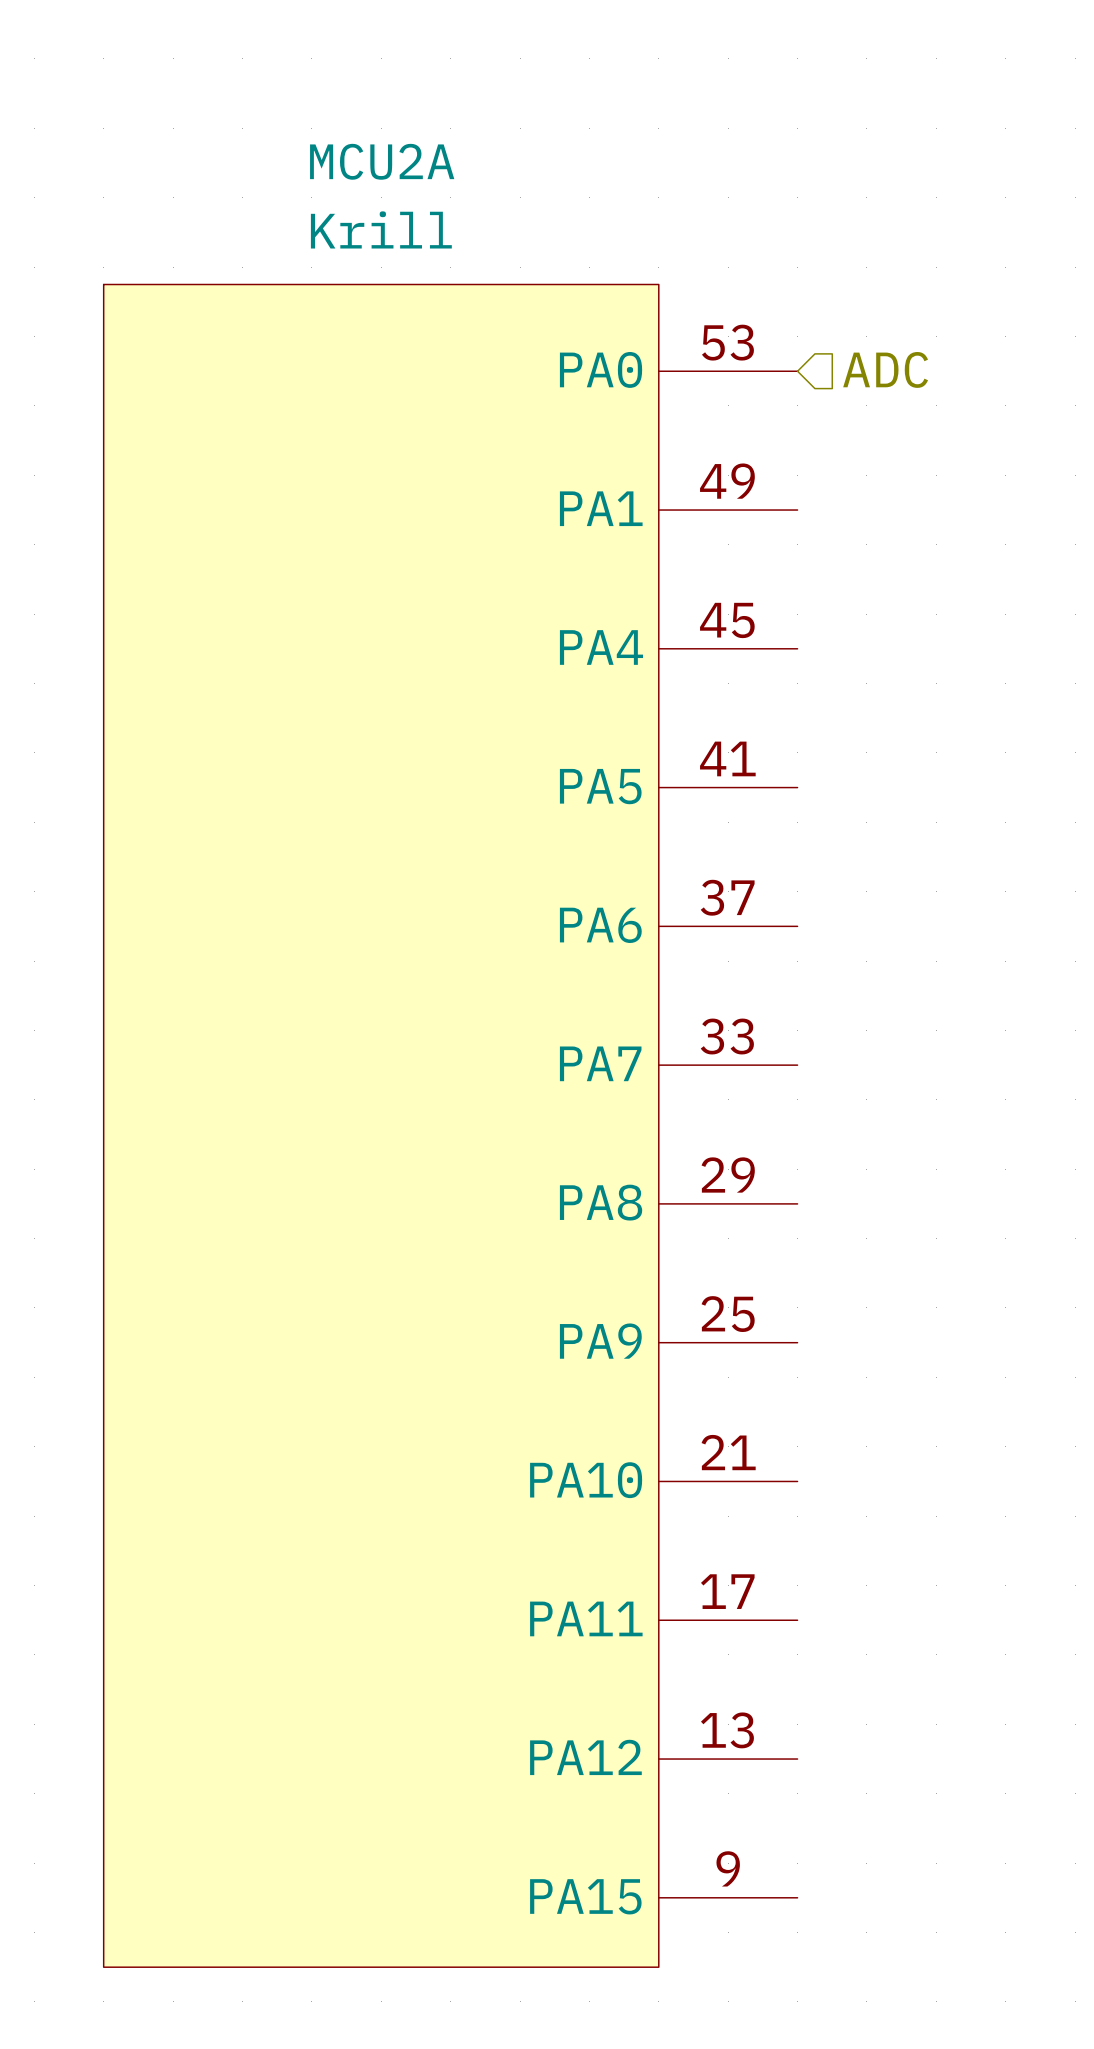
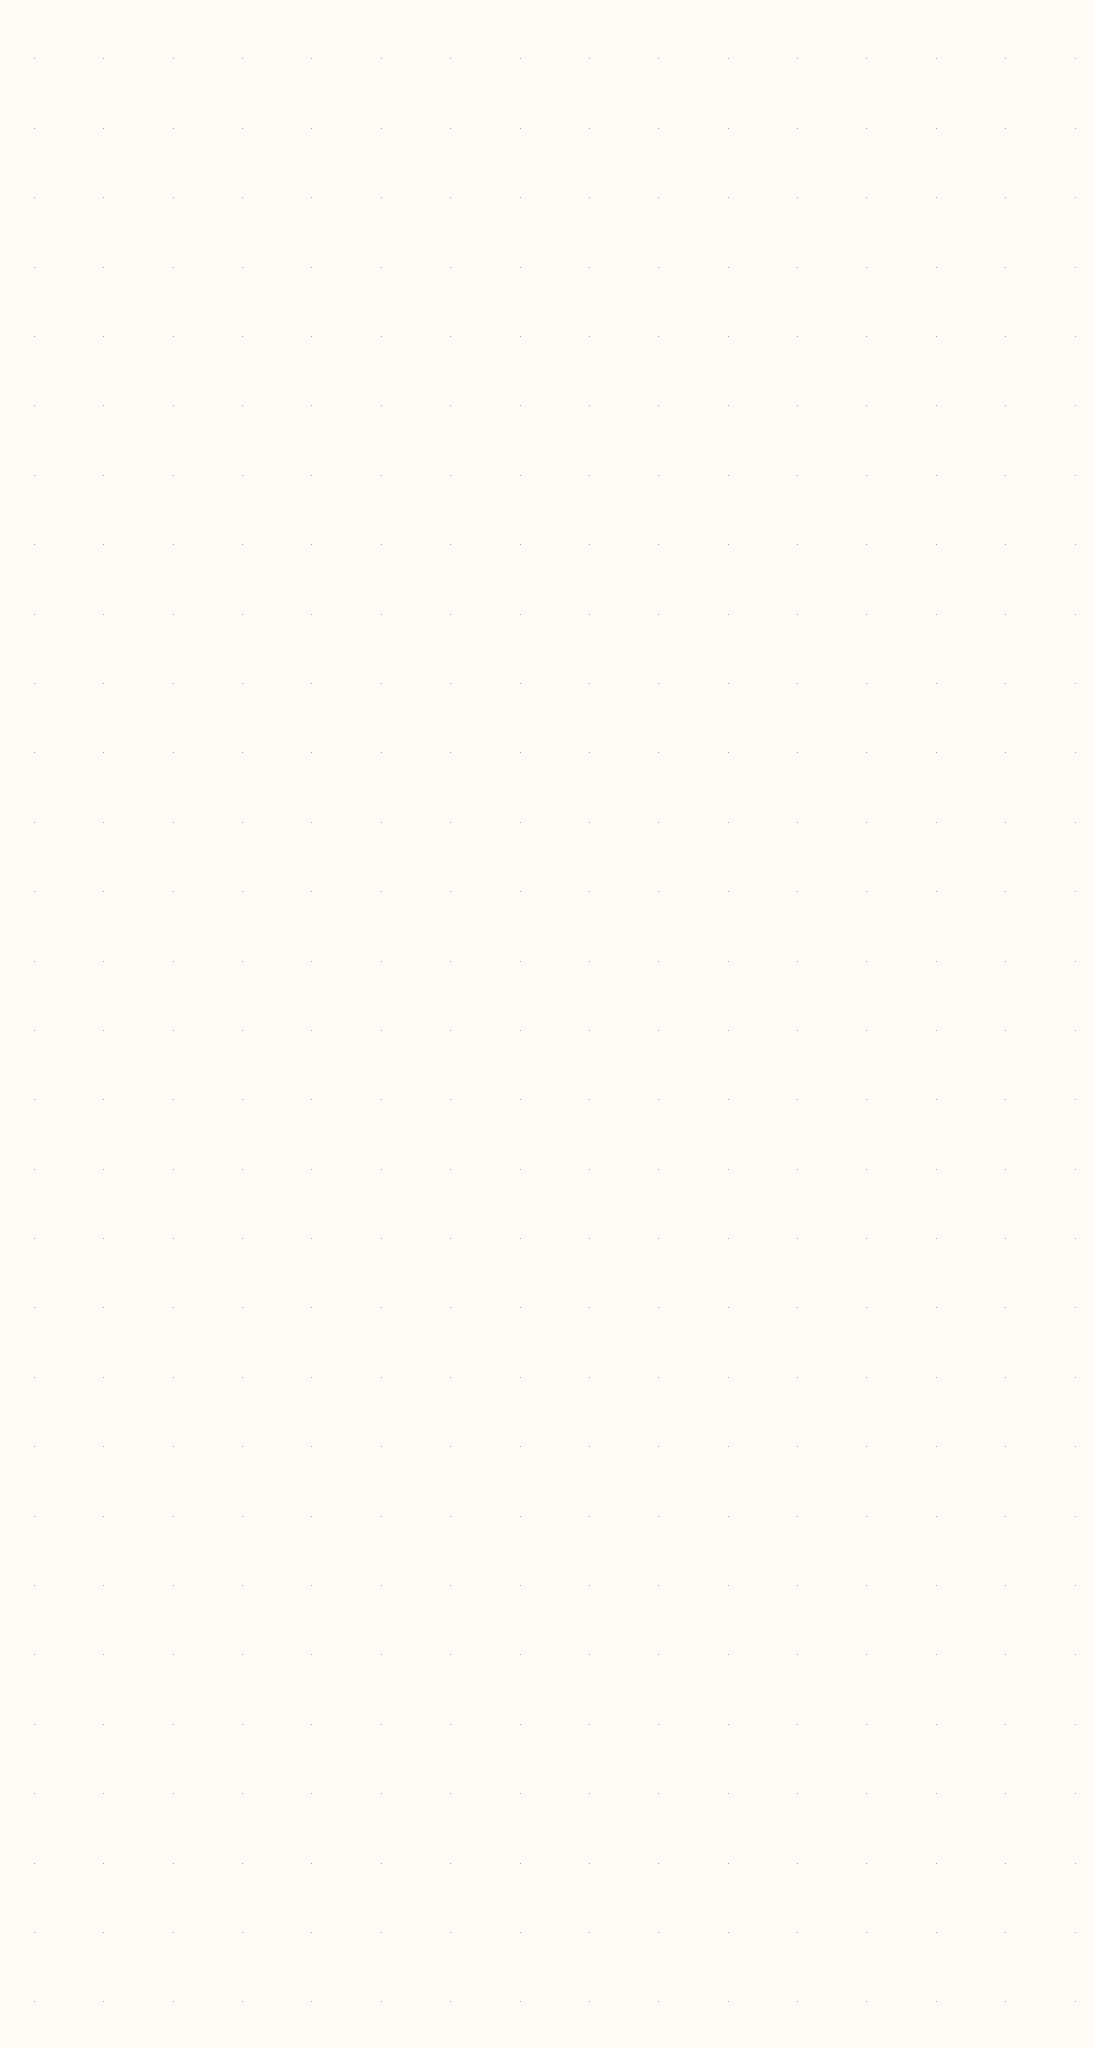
hierarchical label: ADC (885, 369) -> none
MCU2A: Krill (450, 1125) -> none

